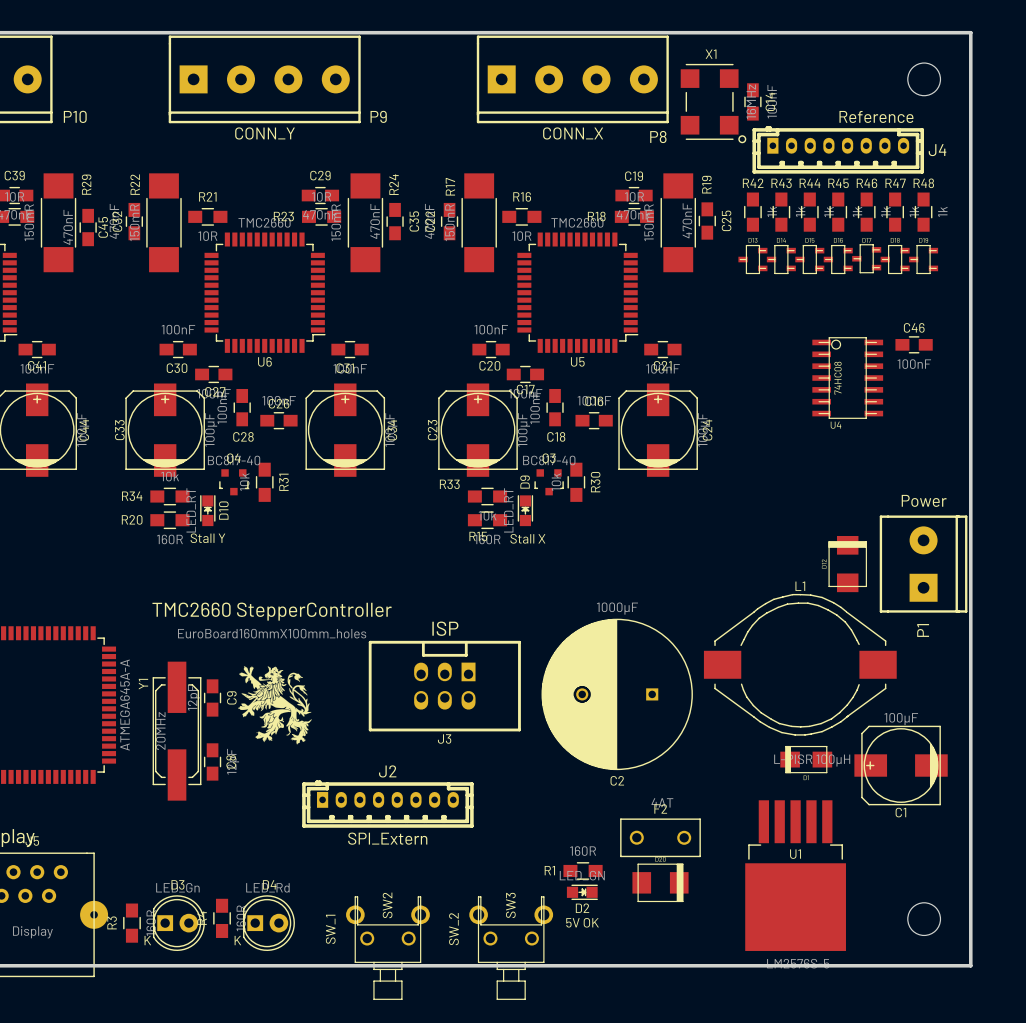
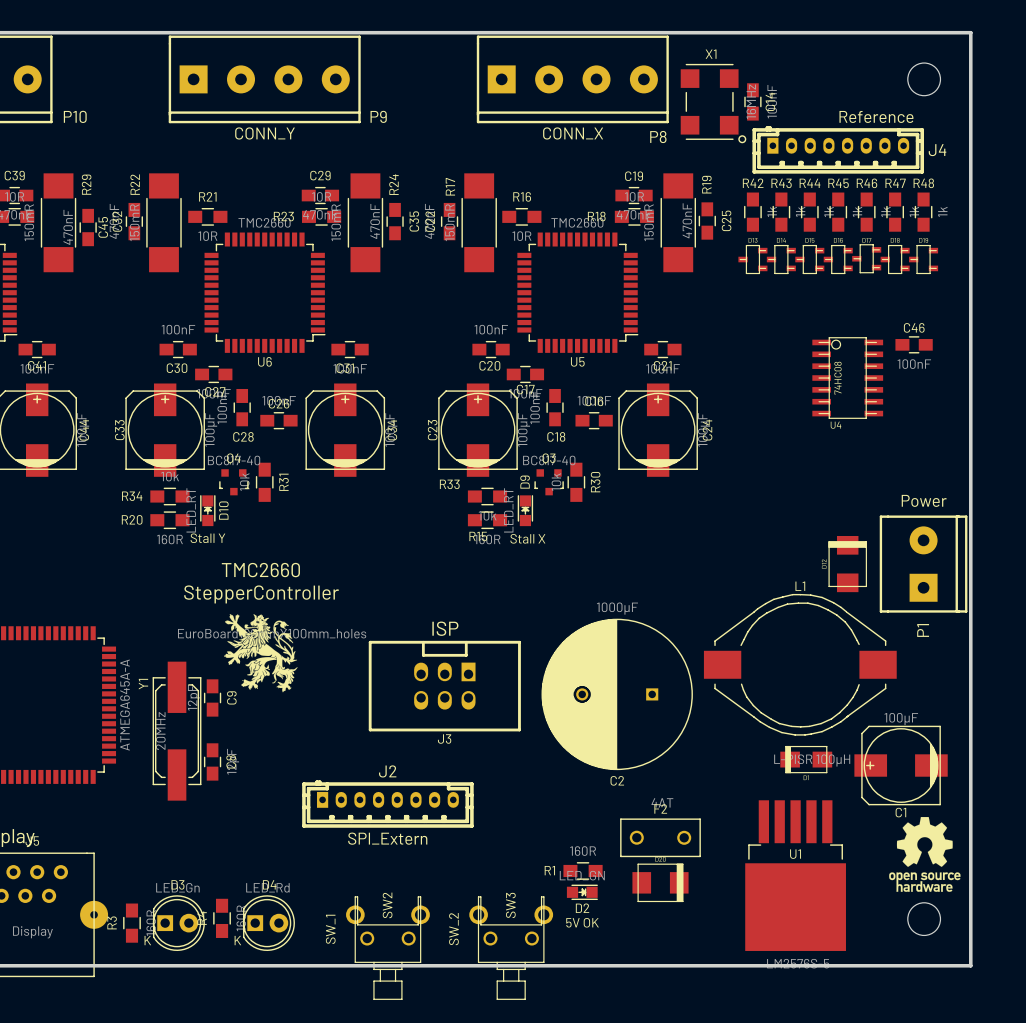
text: none -> TMC2660 (260, 570)
text: TMC2660 StepperController (272, 611) -> StepperController (261, 594)
drawing position: (275, 705) -> (260, 653)
drawing: none -> [889, 817, 961, 892]

